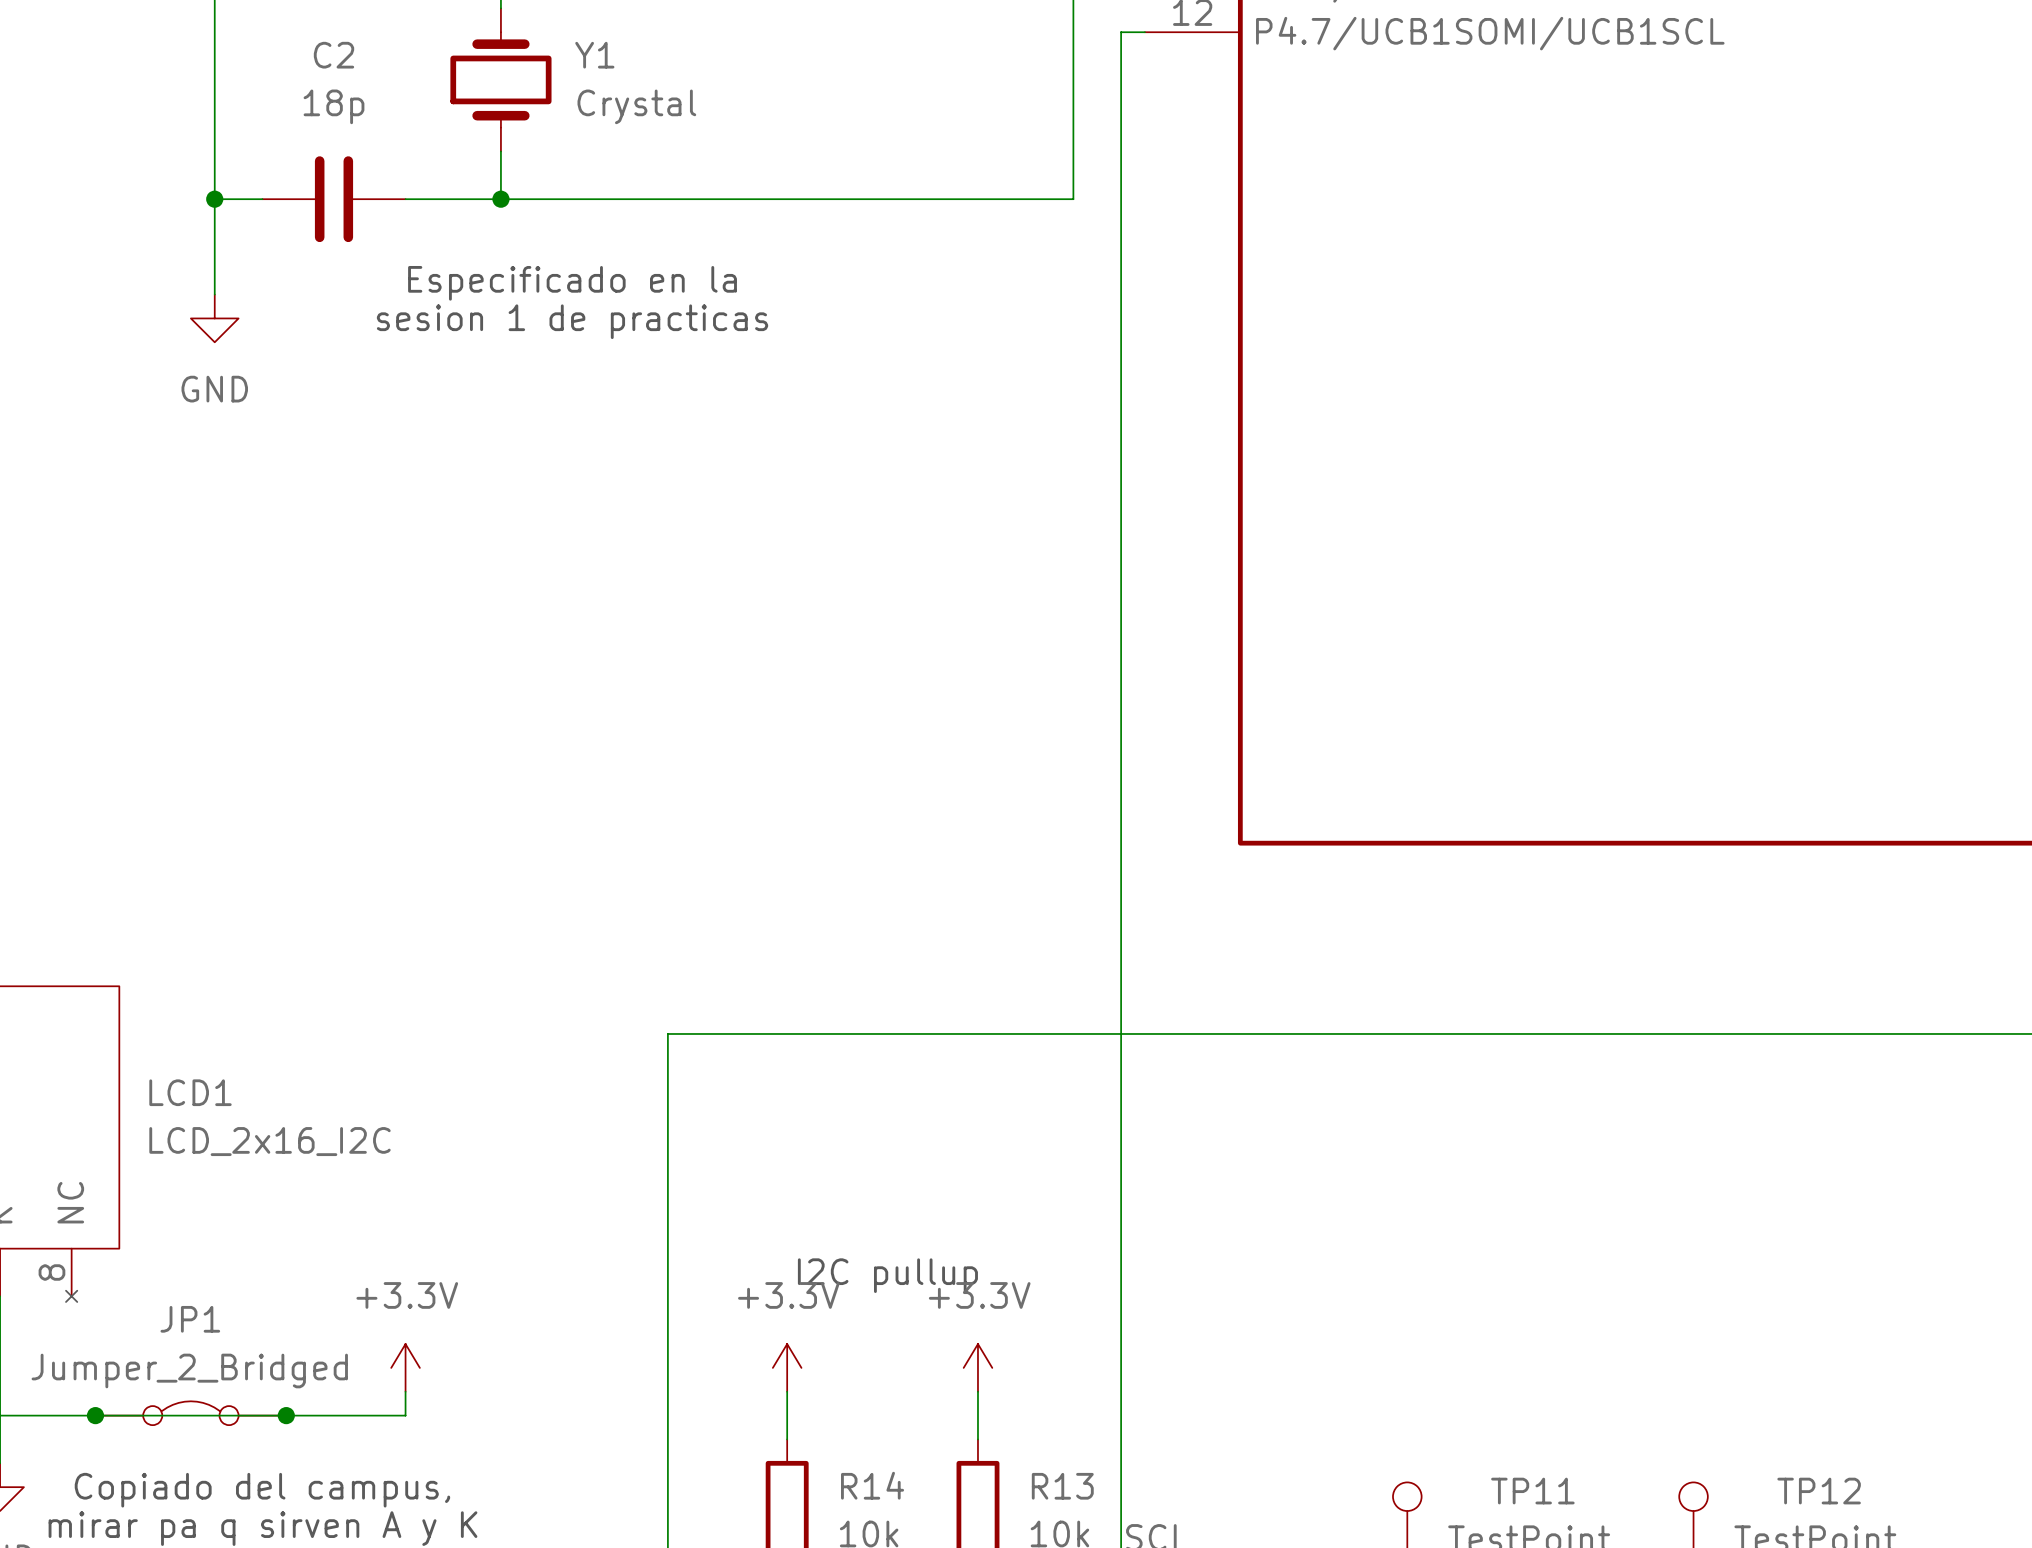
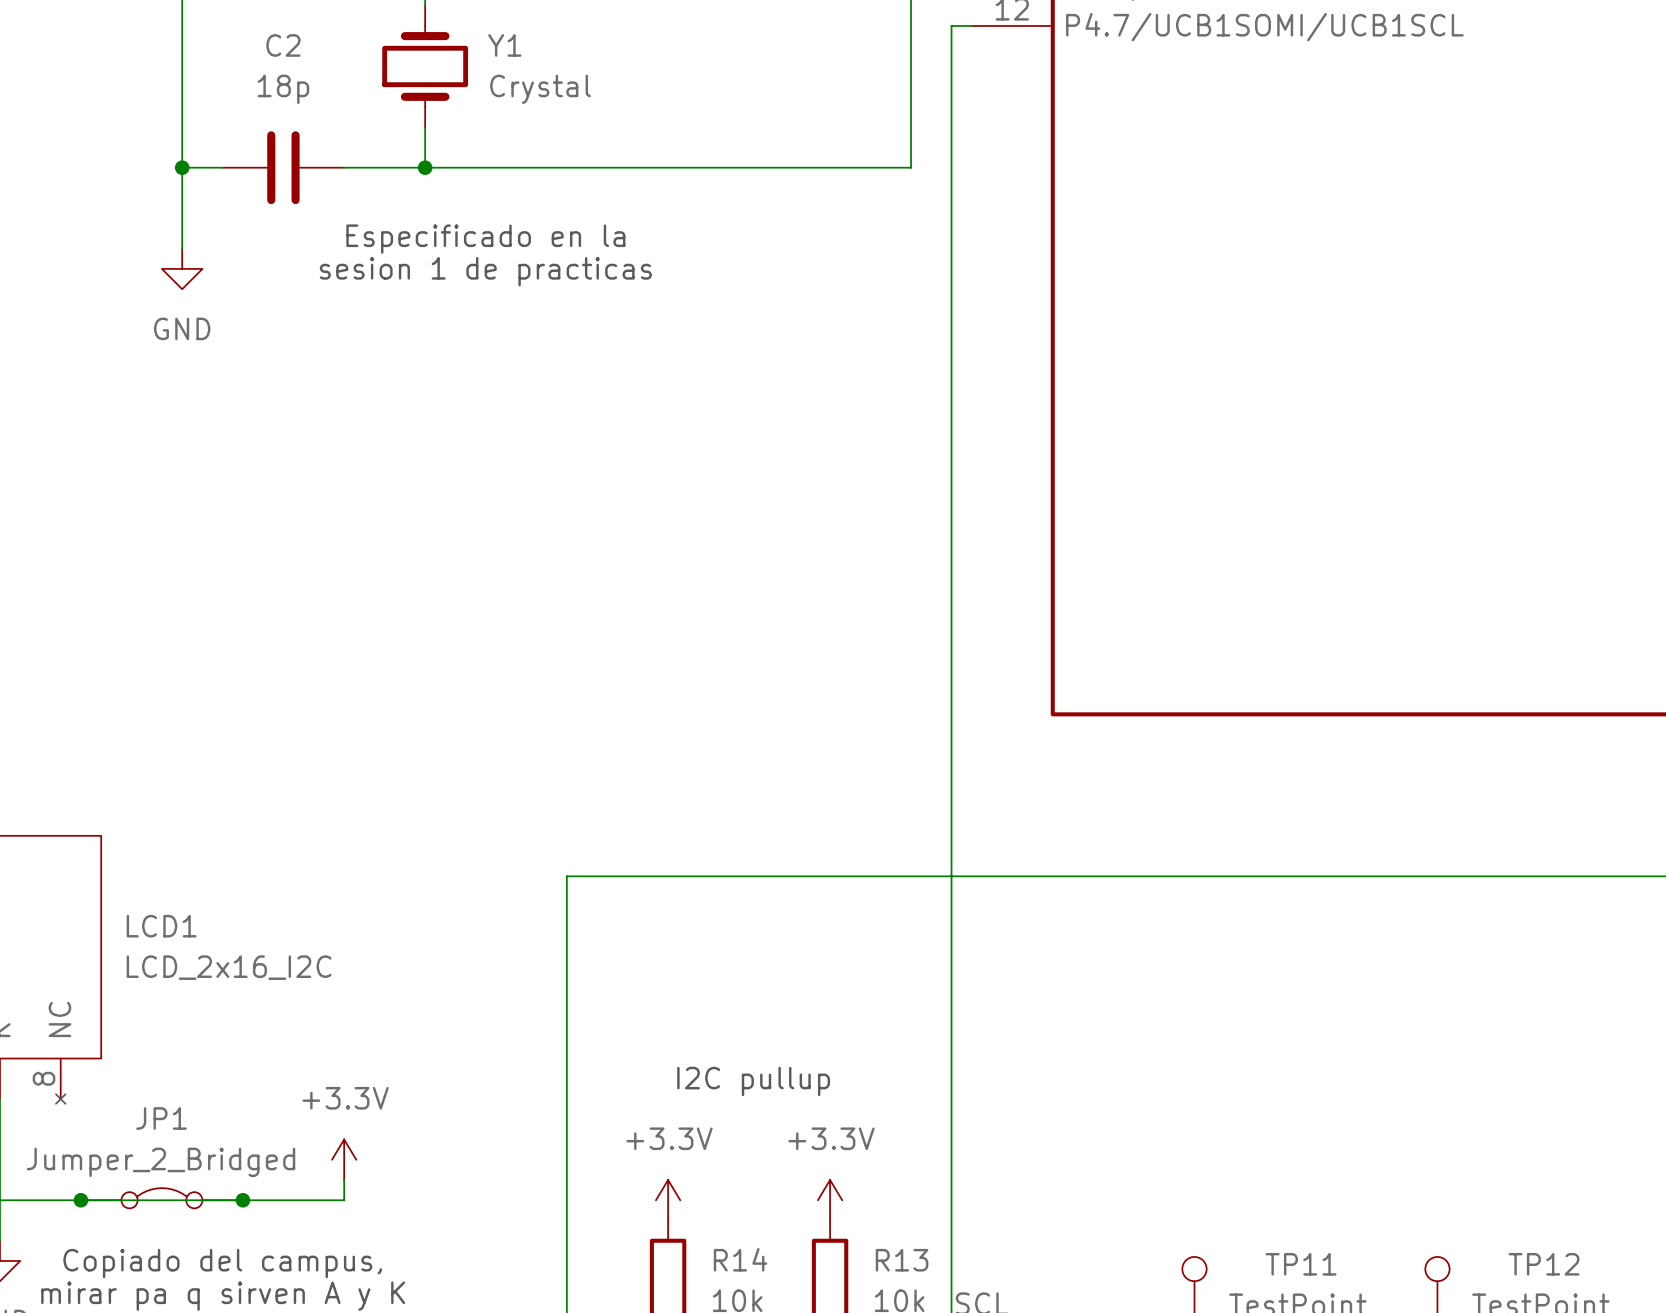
power symbol position: +3.3V (787, 1367) -> +3.3V (668, 1200)
power symbol position: +3.3V (977, 1367) -> +3.3V (830, 1200)

